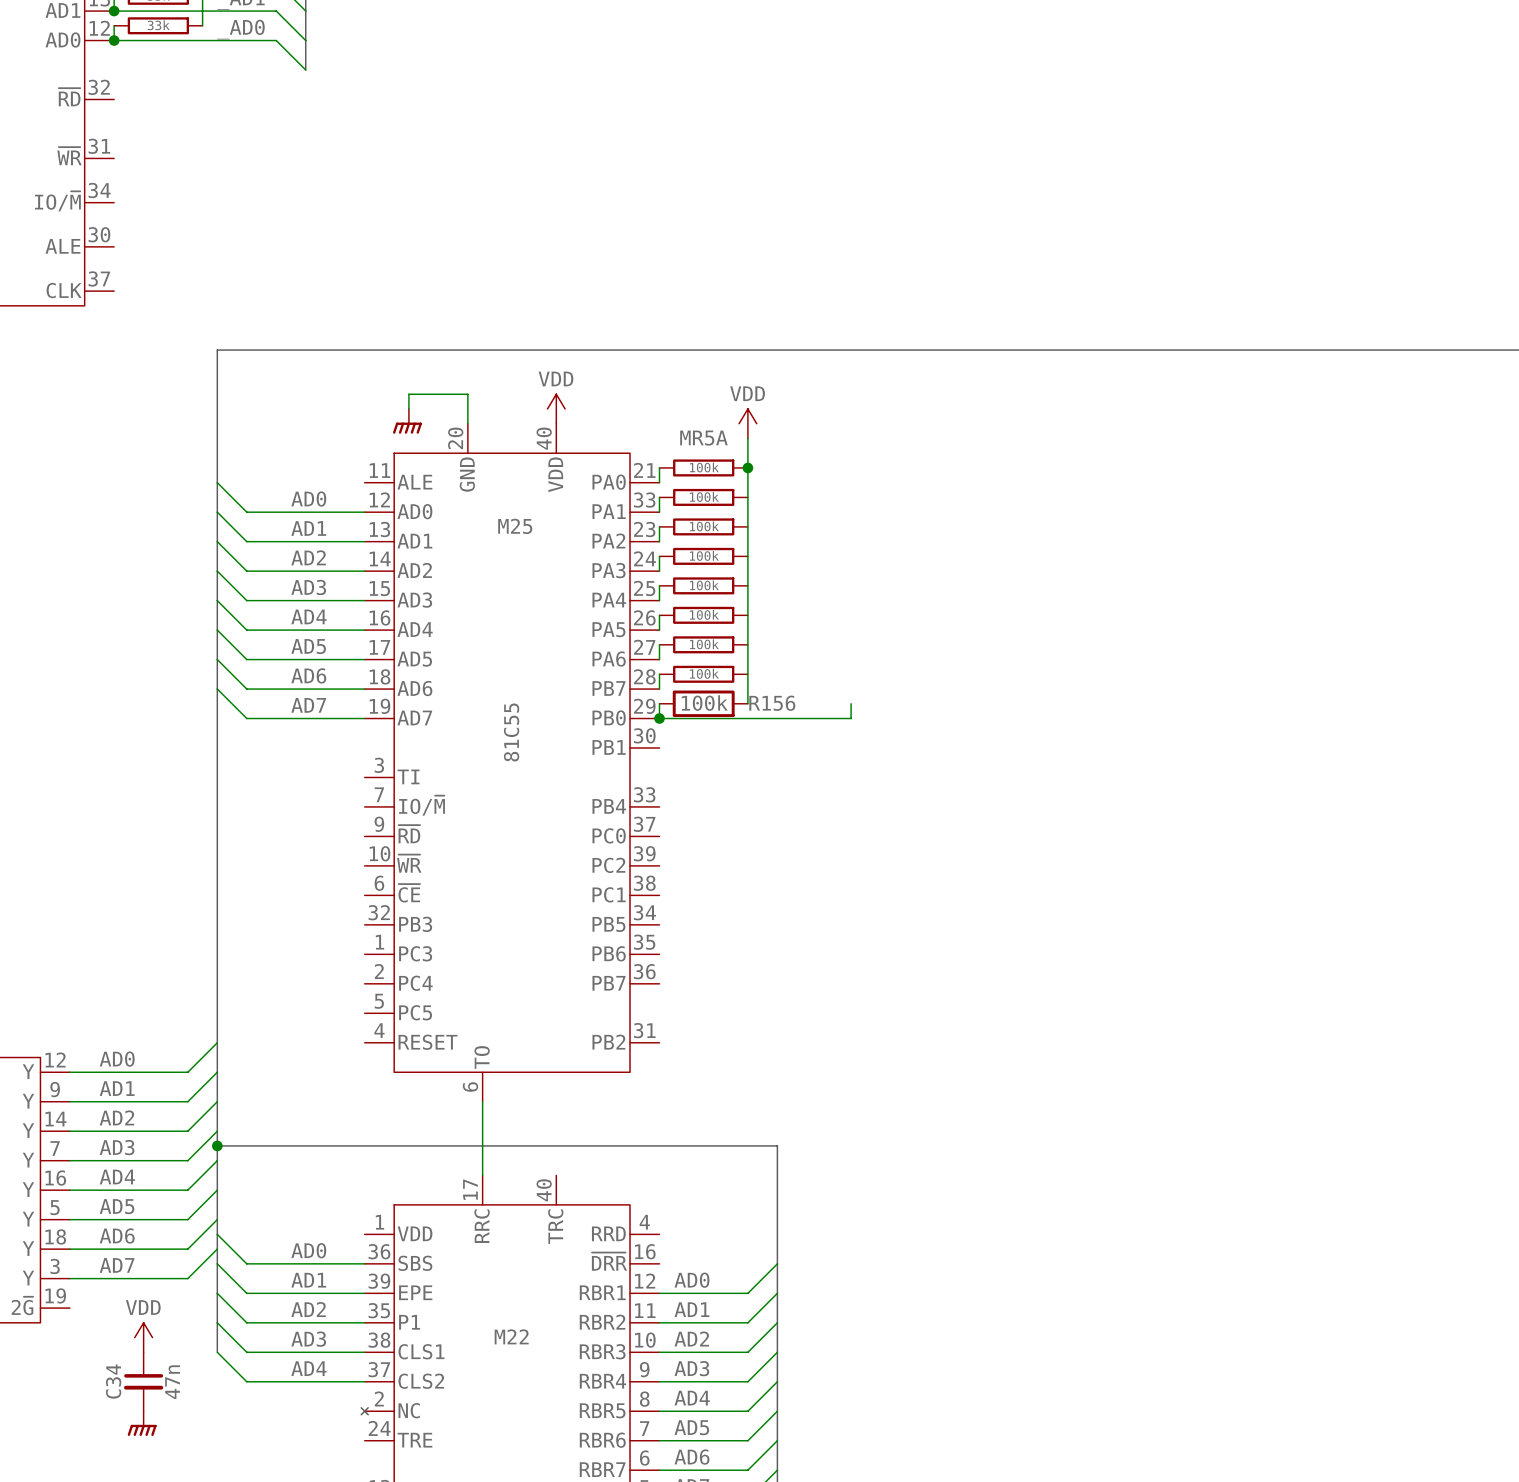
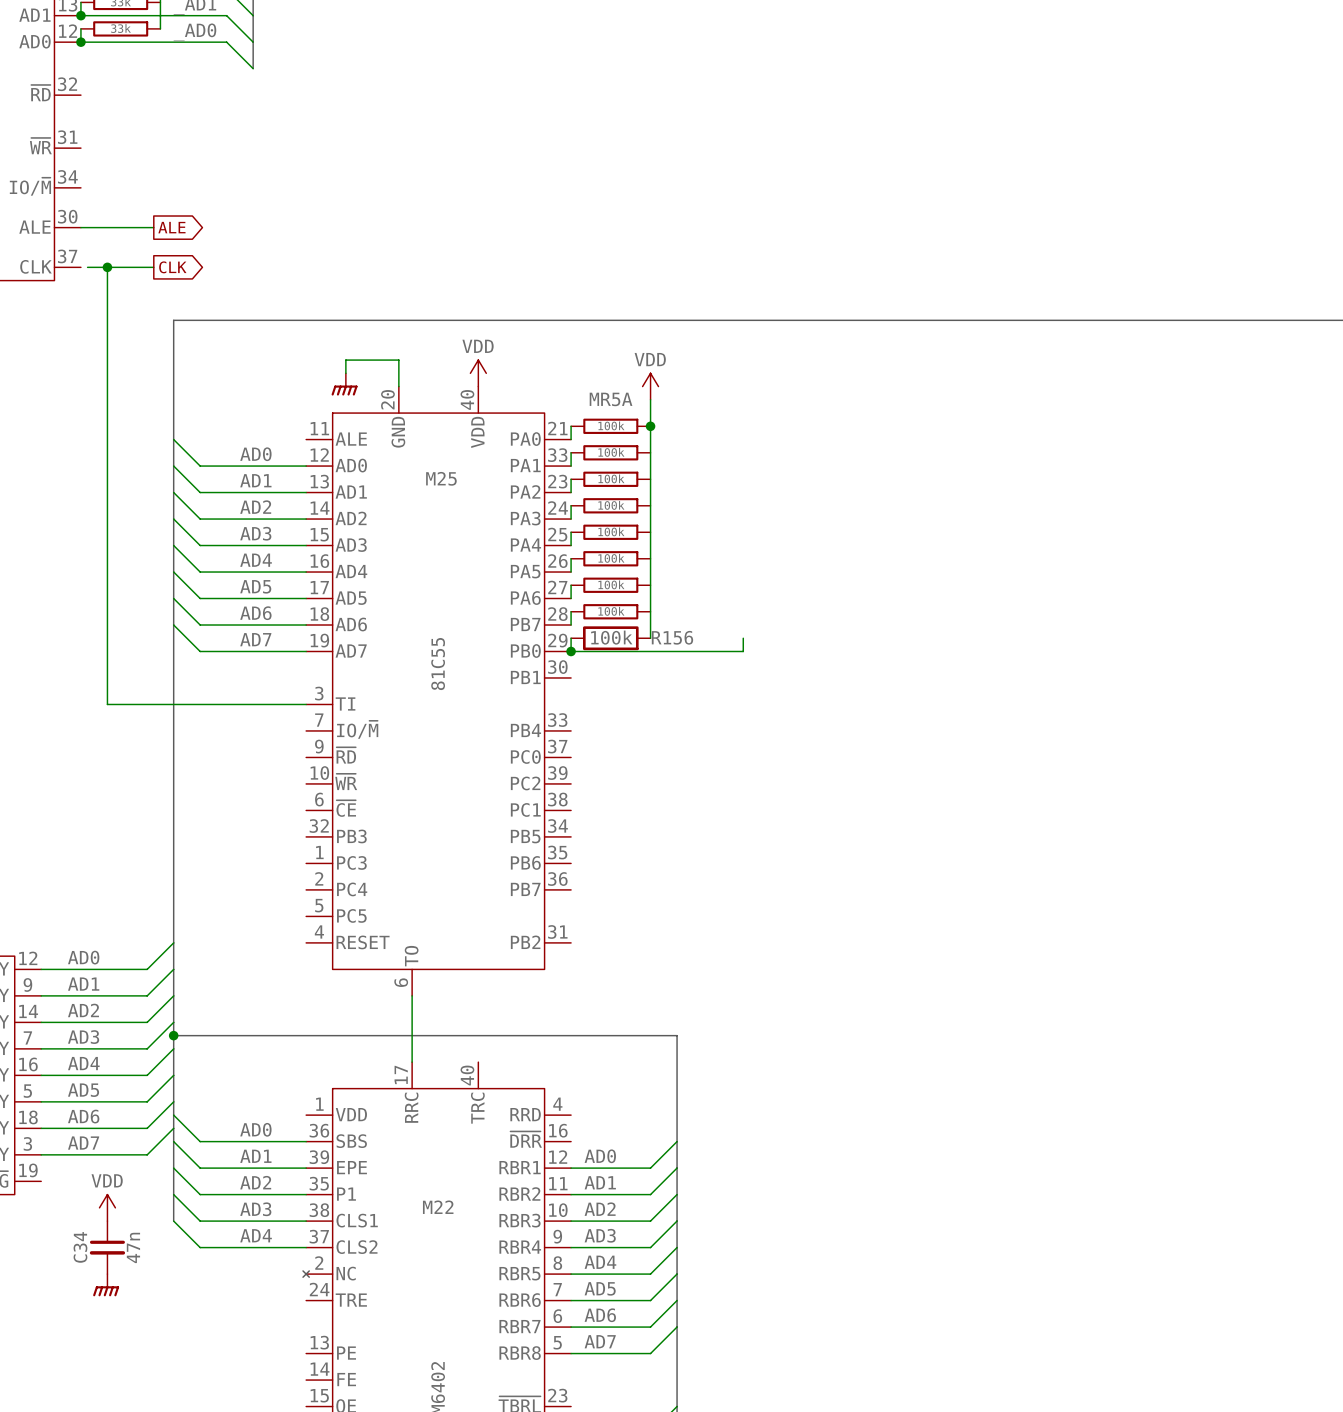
wire: none -> (80, 227) (153, 227)
global label: none -> ALE (171, 227)
wire: none -> (87, 267) (153, 267)
wire: none -> (107, 267) (107, 704) (306, 704)
junction: none -> (107, 267)
global label: none -> CLK (172, 267)

